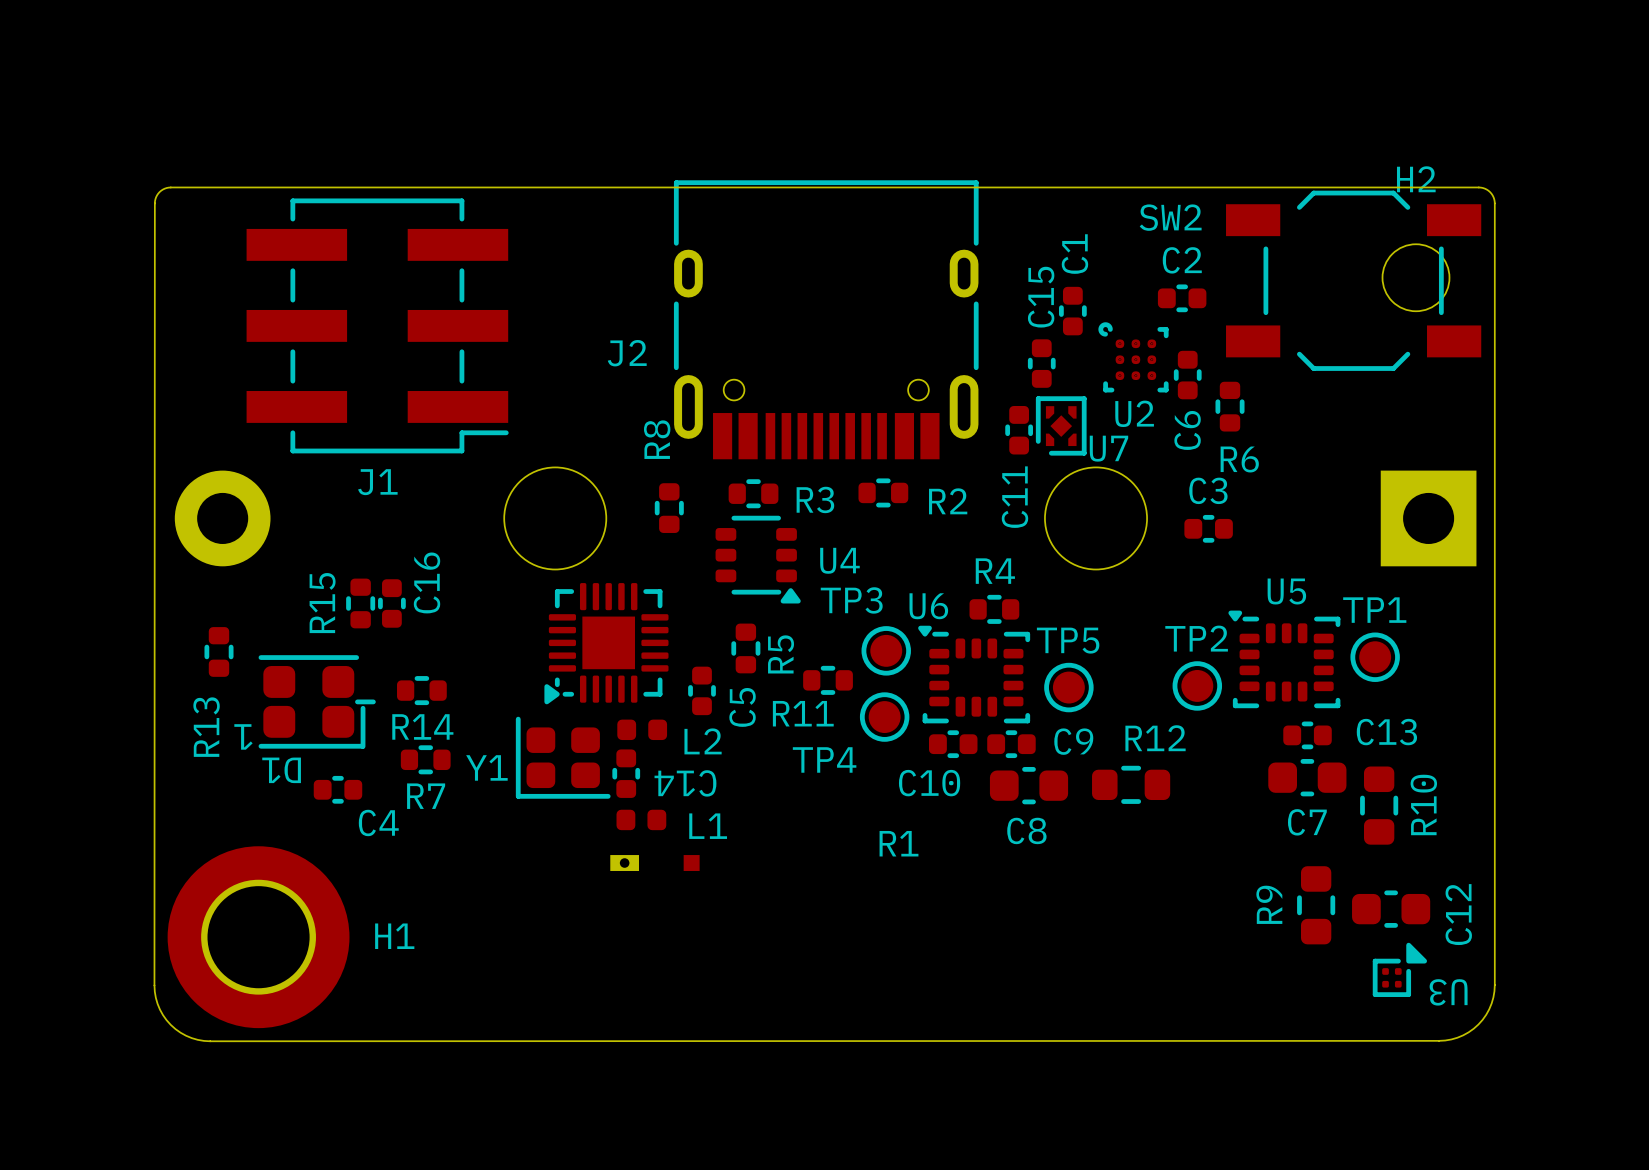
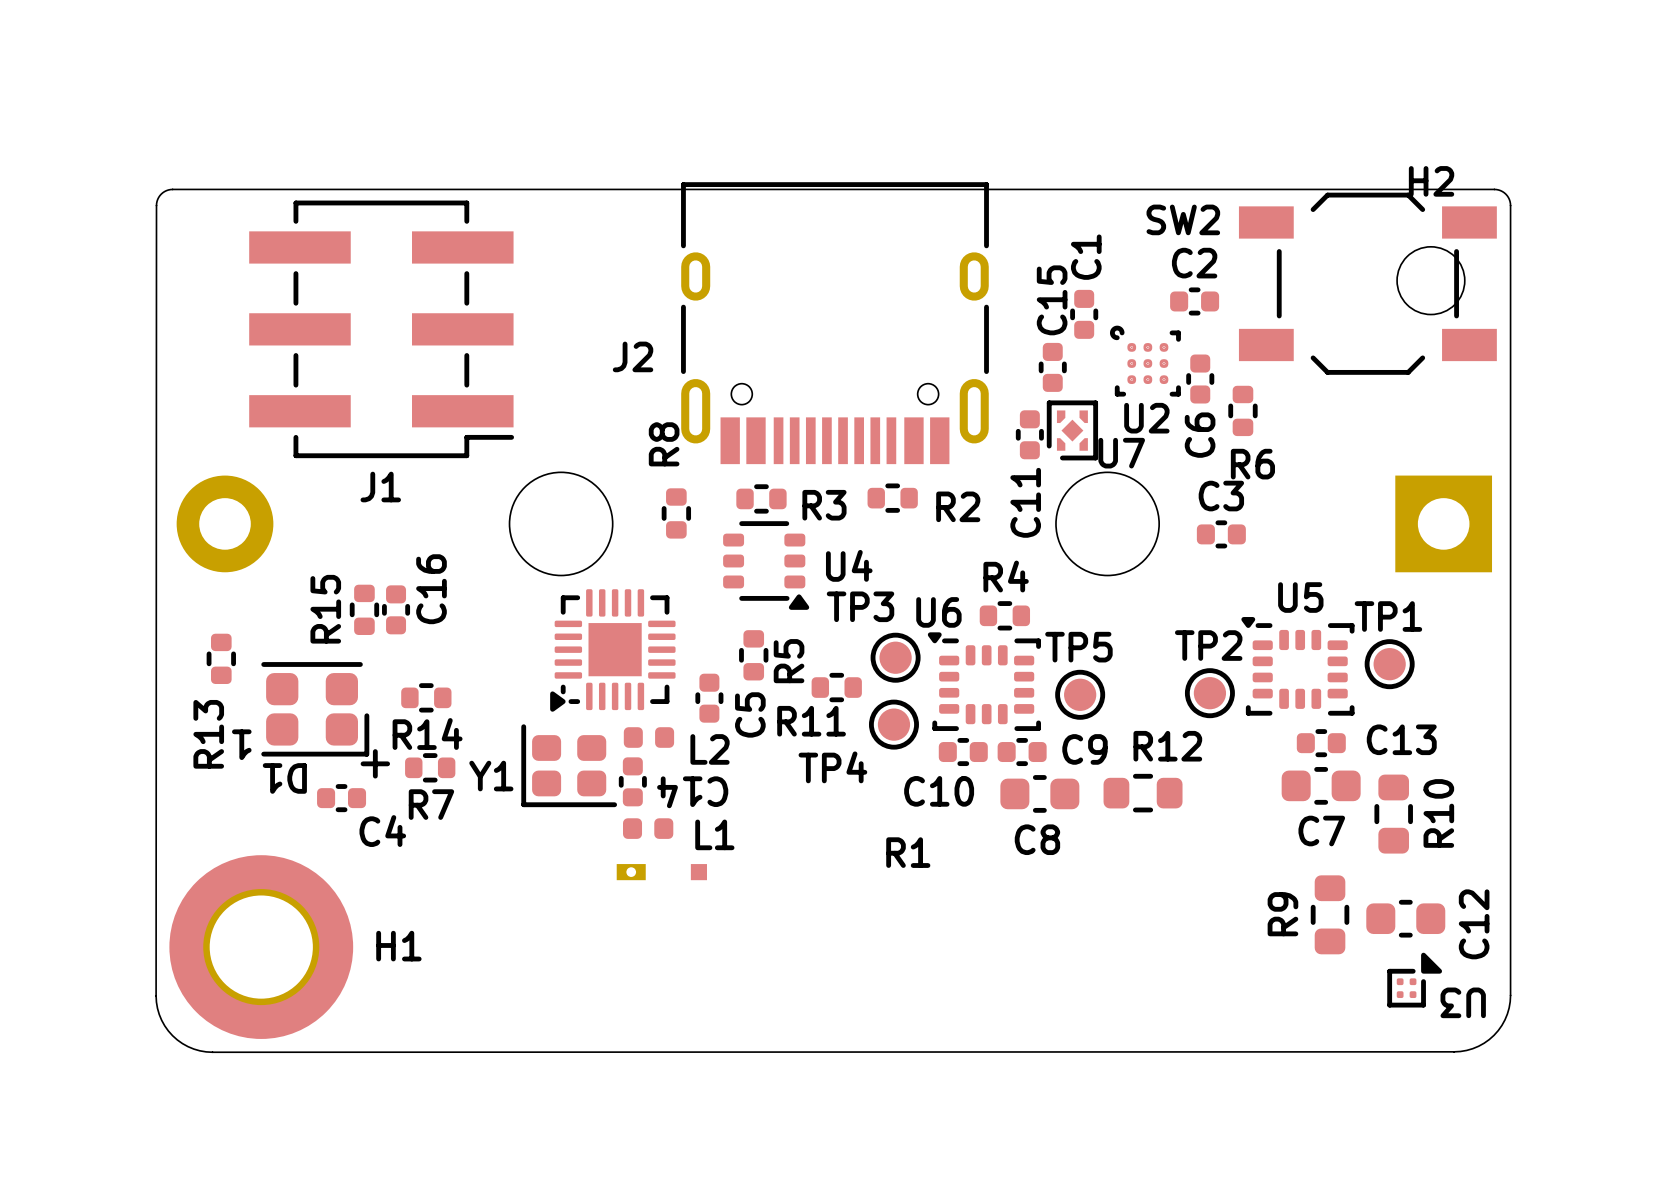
line: (357, 701) (373, 701) -> none
text: none -> + (375, 763)

